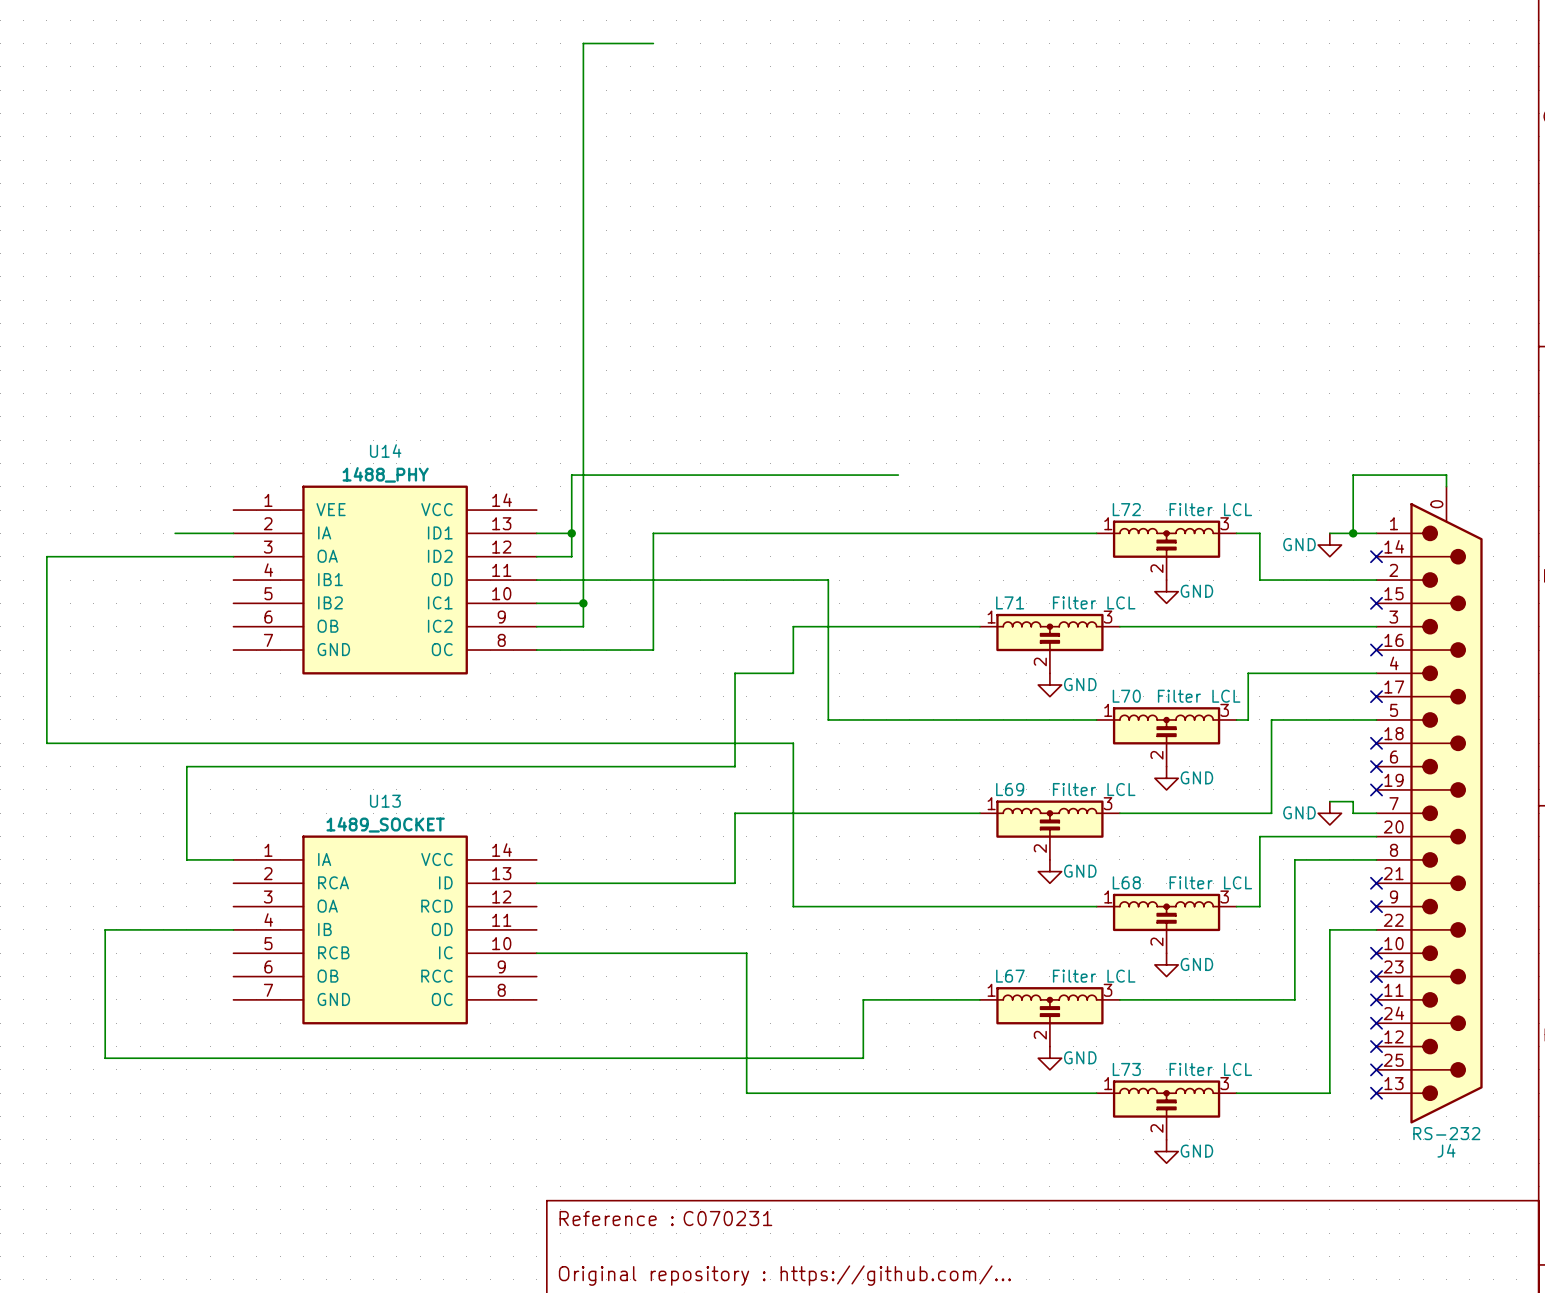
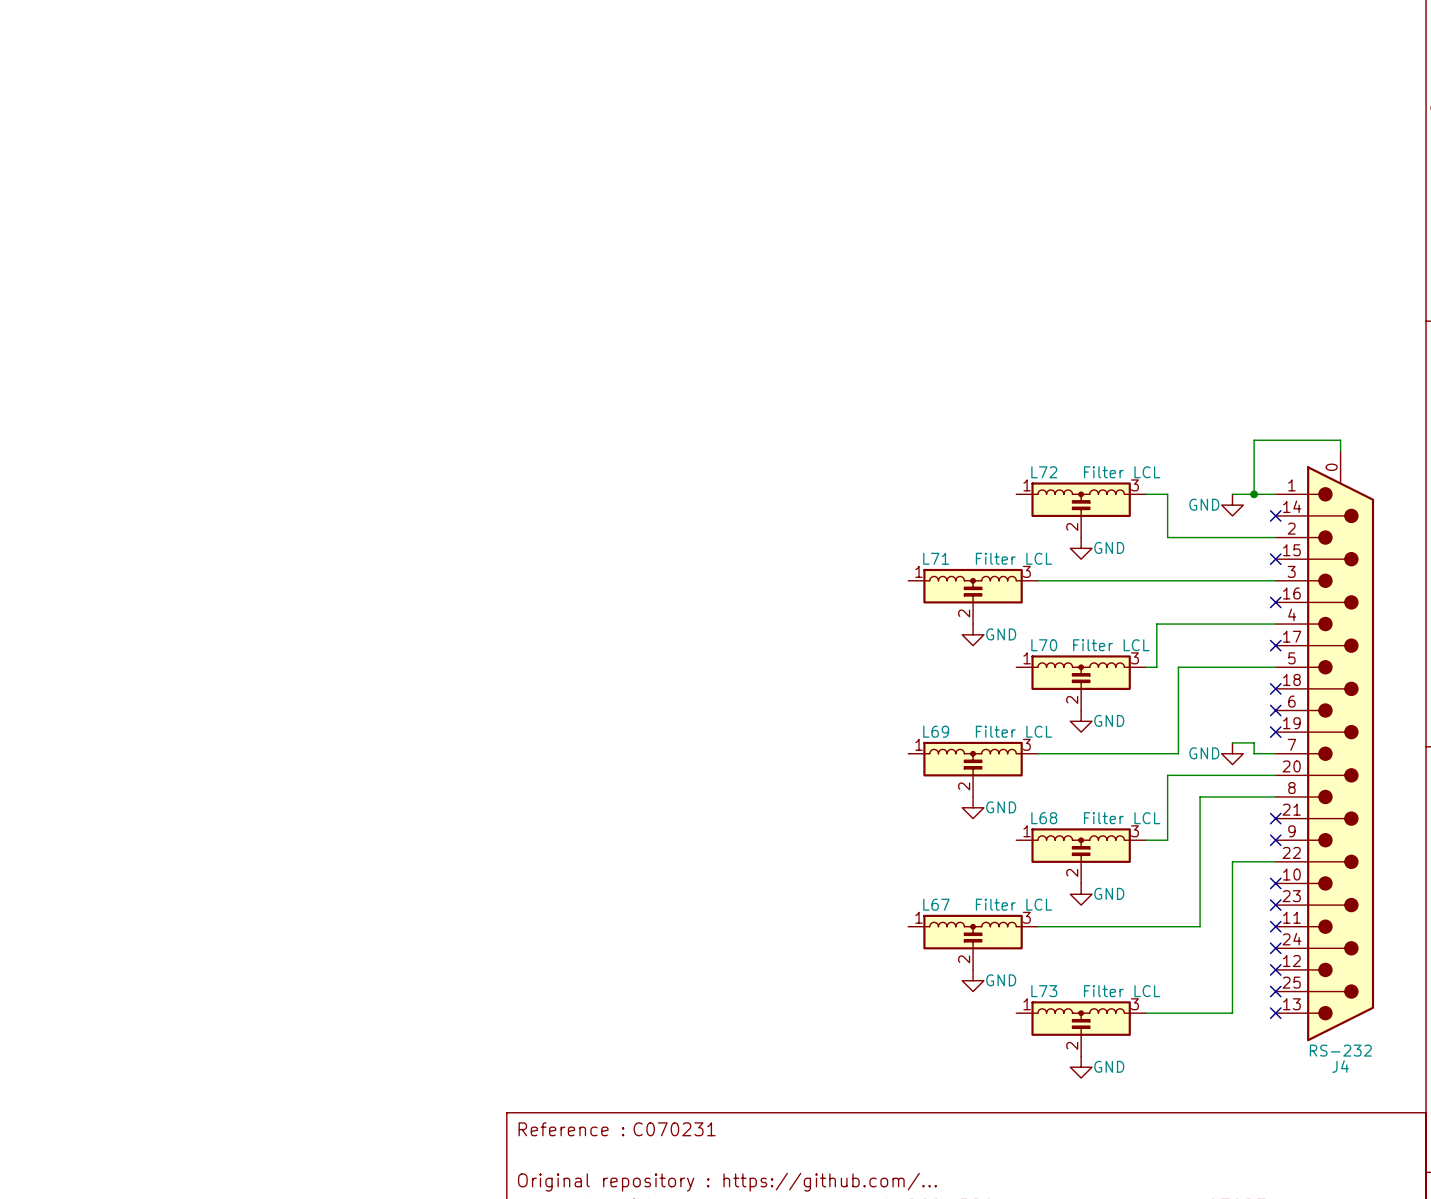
wire: (653, 43) (583, 43) (583, 626) (536, 626) -> none
wire: (898, 475) (571, 475) (571, 556) (536, 556) -> none
wire: (175, 533) (233, 533) -> none
wire: (536, 533) (571, 533) -> none
junction: (571, 533) -> none
wire: (1096, 533) (653, 533) (653, 650) (536, 650) -> none
wire: (233, 556) (46, 556) (46, 743) (793, 743) (793, 906) (1096, 906) -> none
U14: 1488_PHY (385, 580) -> none
wire: (536, 580) (828, 580) (828, 719) (1096, 719) -> none
wire: (536, 603) (583, 603) -> none
junction: (583, 603) -> none
wire: (979, 626) (793, 626) (793, 673) (735, 673) (735, 766) (186, 766) (186, 859) (233, 859) -> none
wire: (979, 813) (735, 813) (735, 883) (536, 883) -> none
wire: (233, 929) (105, 929) (105, 1058) (863, 1058) (863, 999) (979, 999) -> none
U13: 1489_SOCKET (385, 929) -> none
wire: (536, 953) (746, 953) (746, 1093) (1096, 1093) -> none

